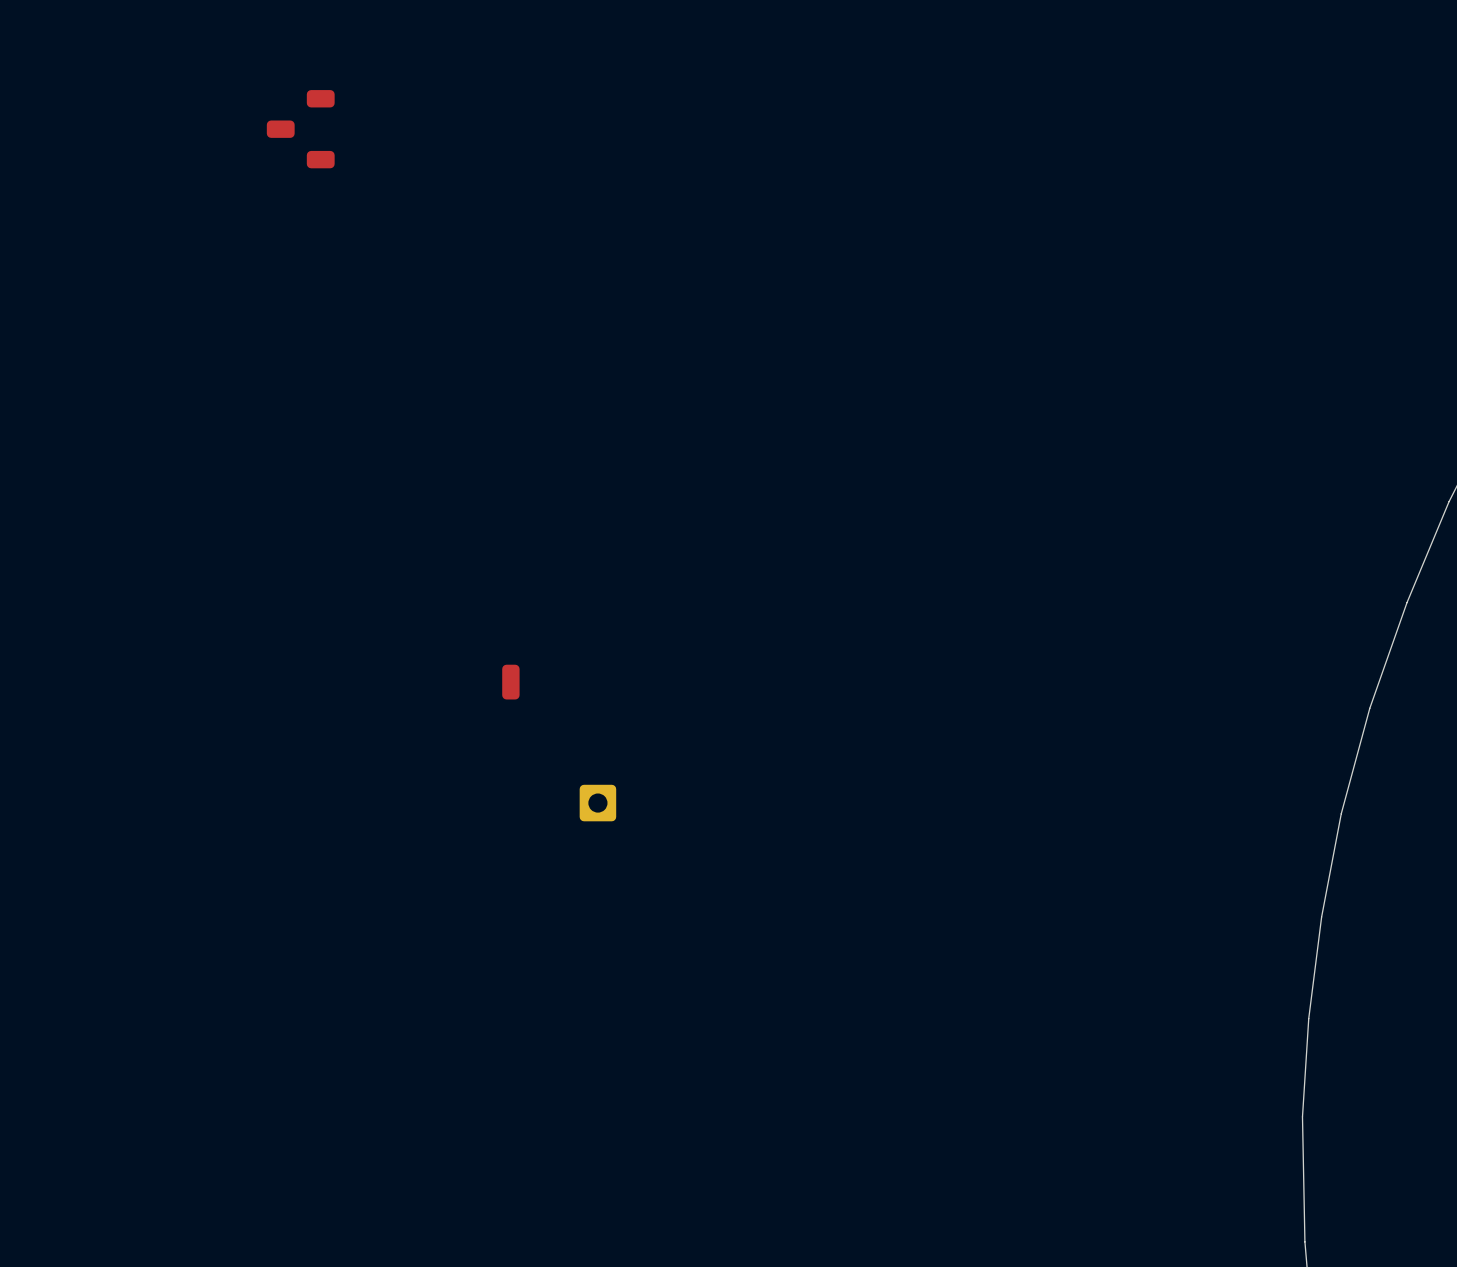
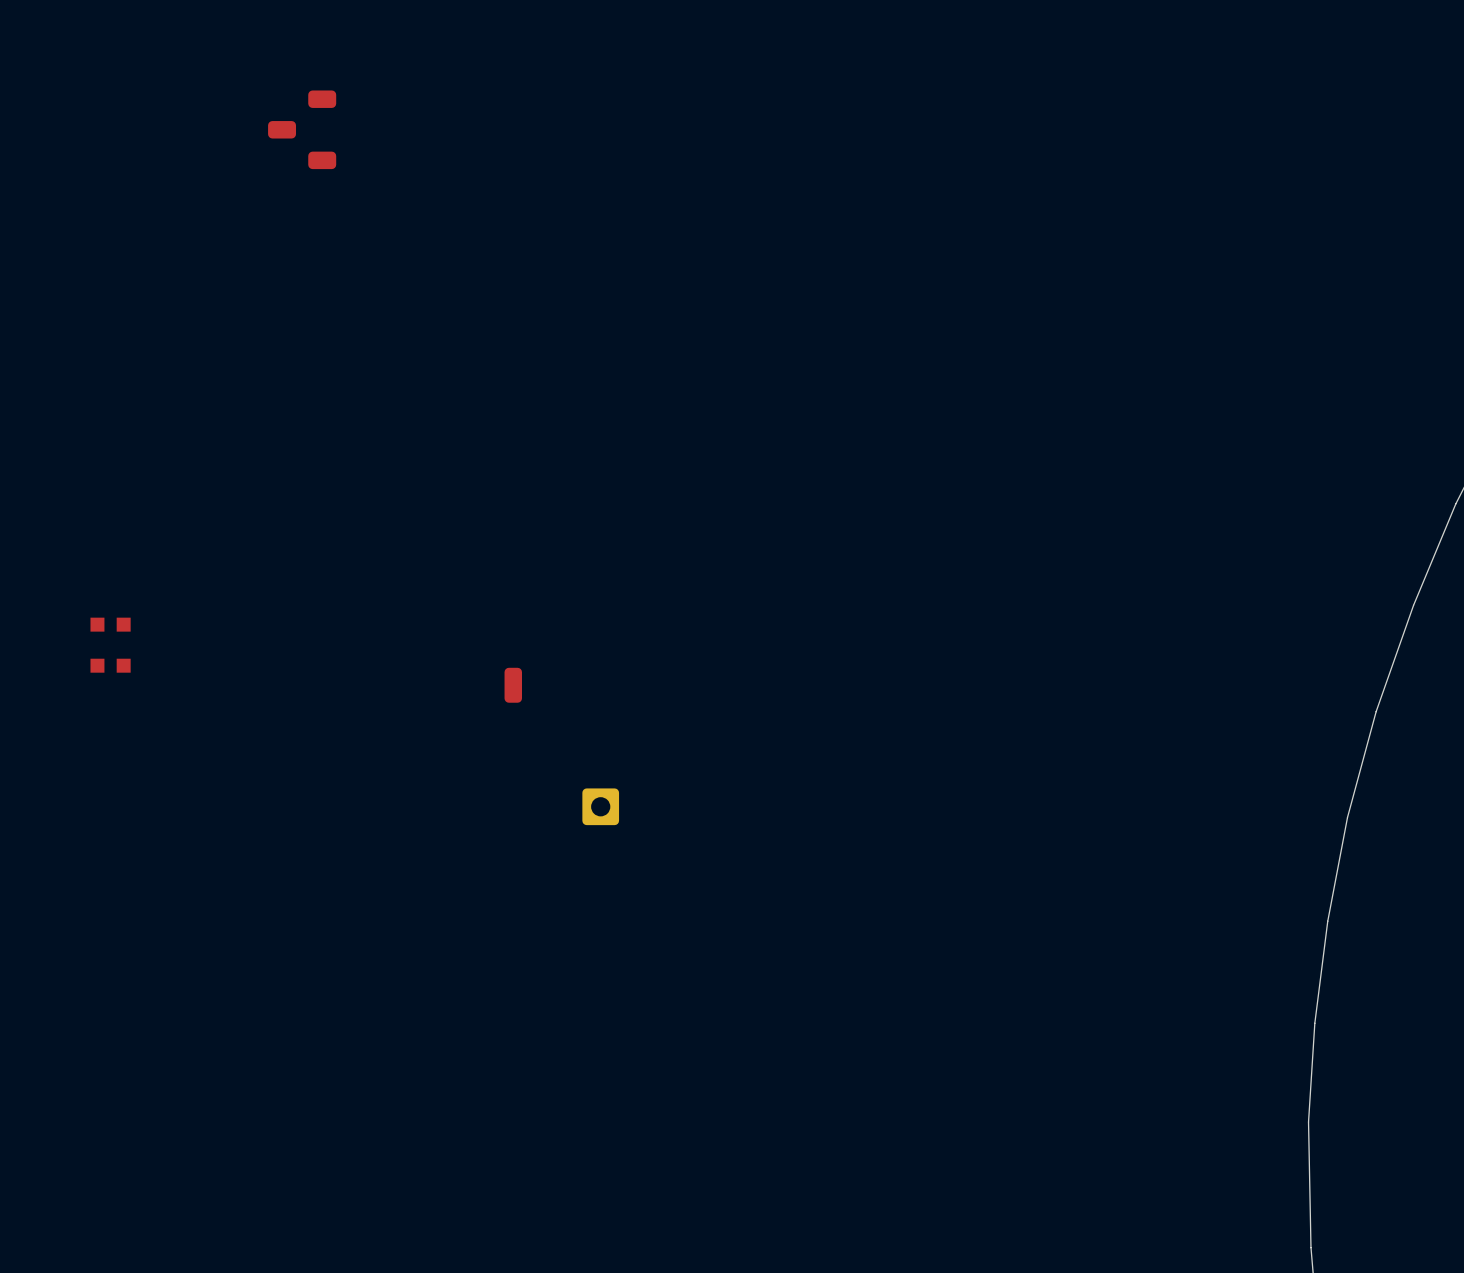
part: none -> (110, 624)
part: none -> (110, 665)

